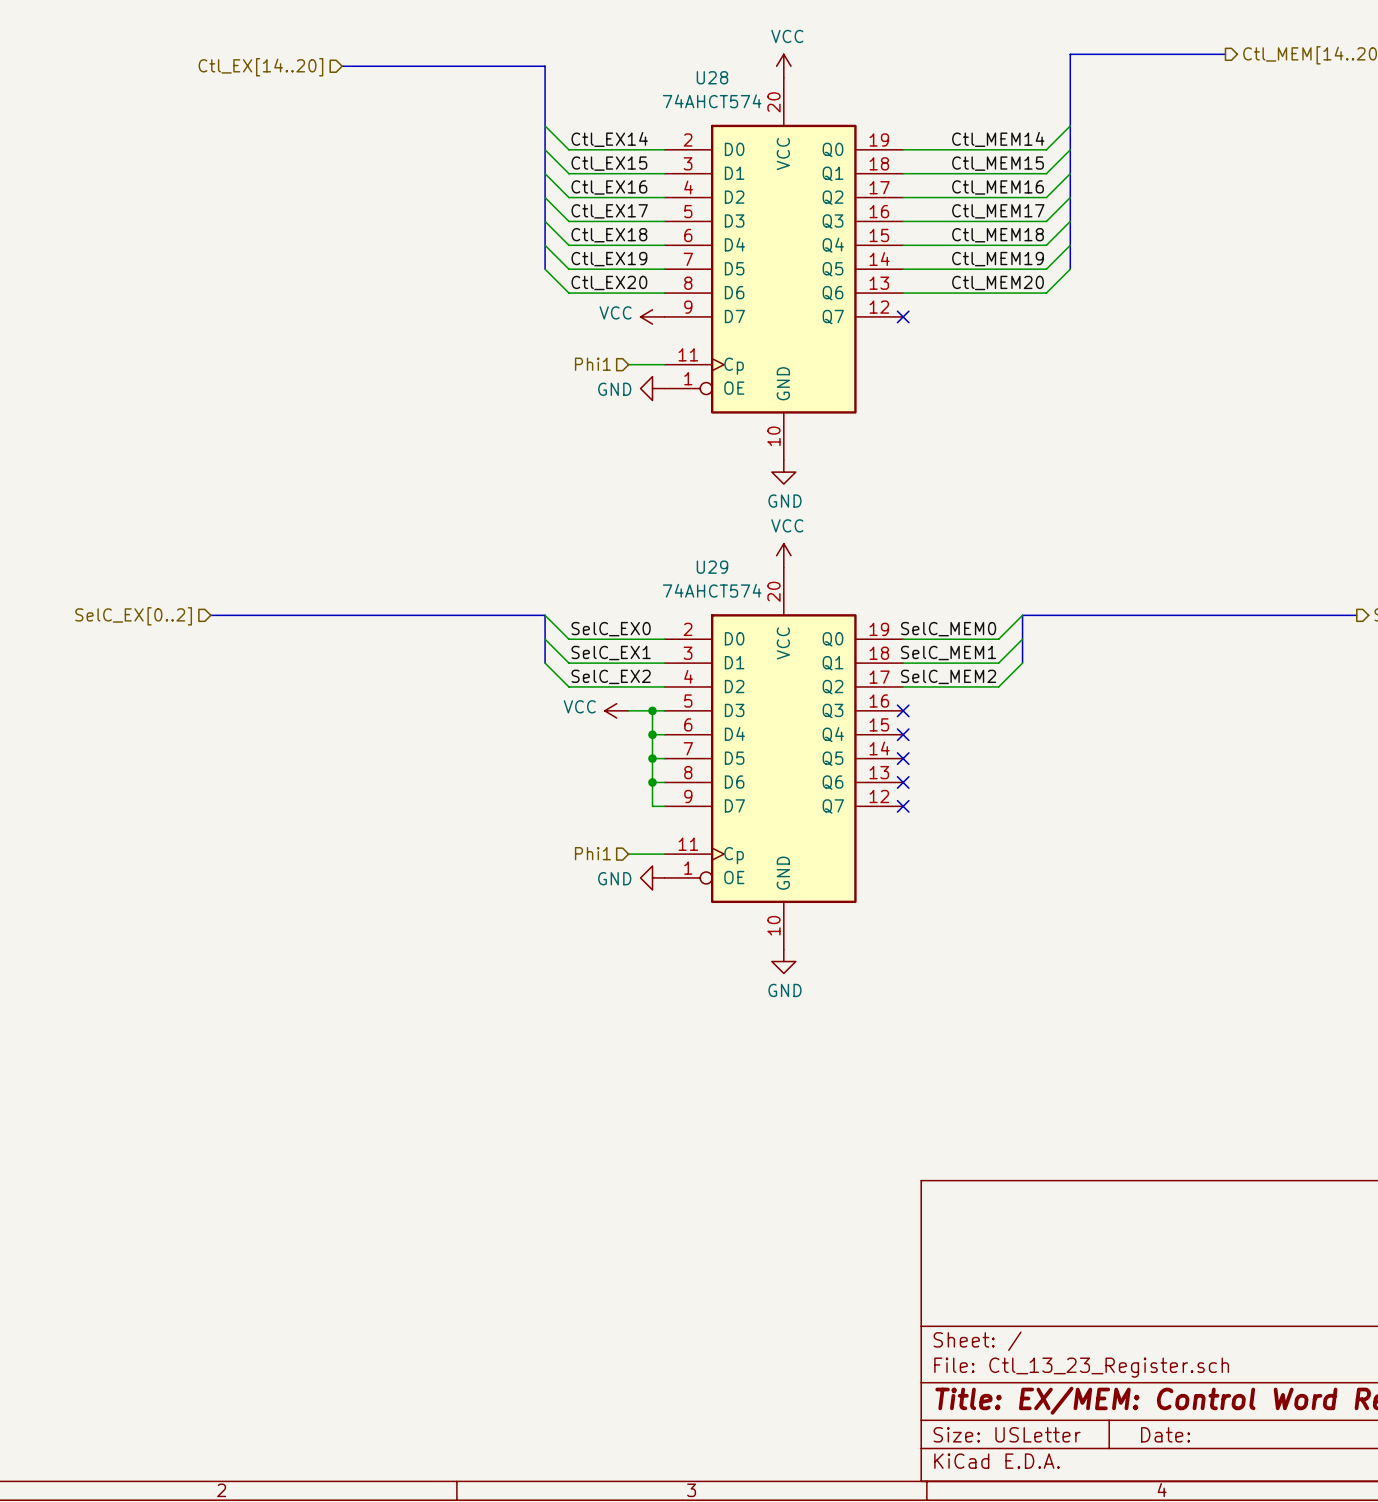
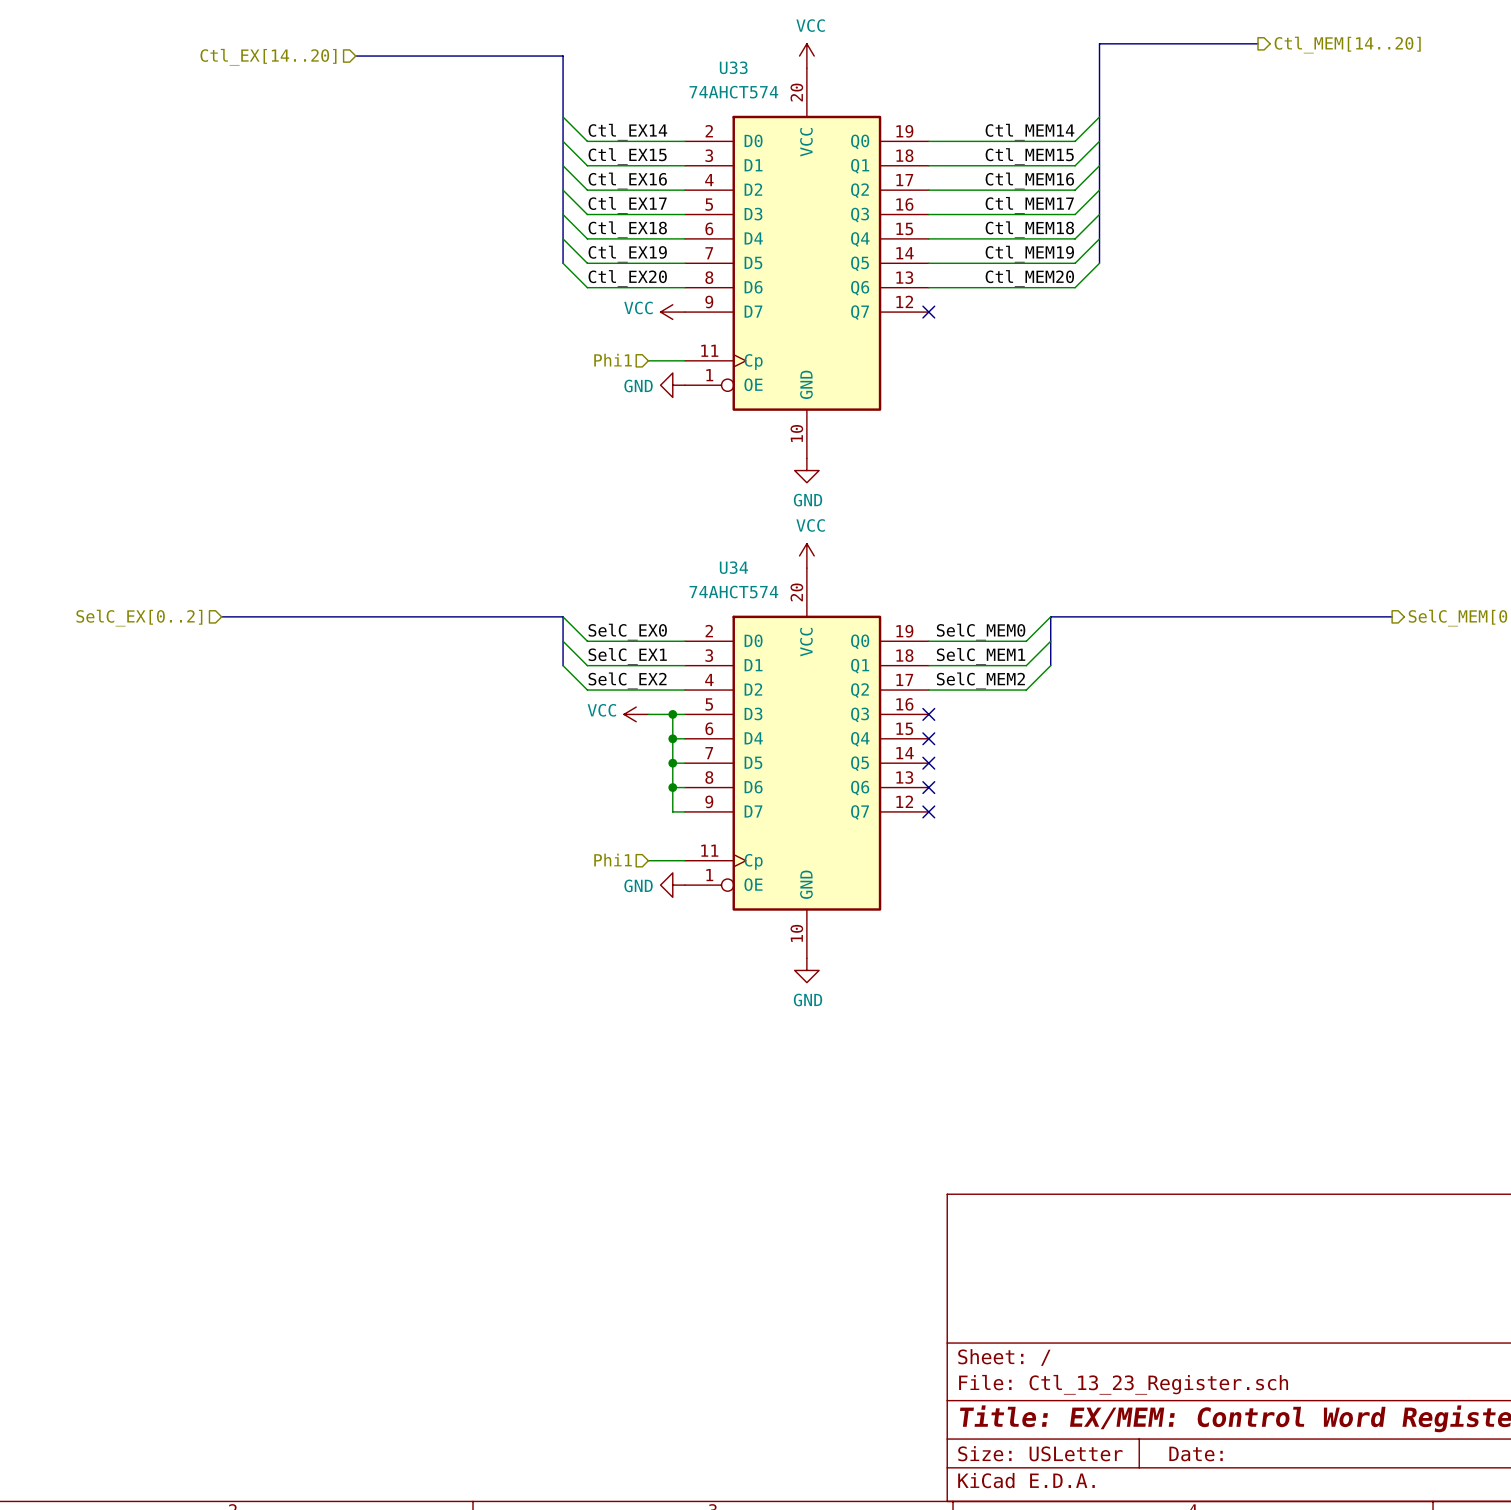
U28 name: U28 (712, 77) -> U33 (733, 67)
U29 name: U29 (712, 567) -> U34 (733, 567)

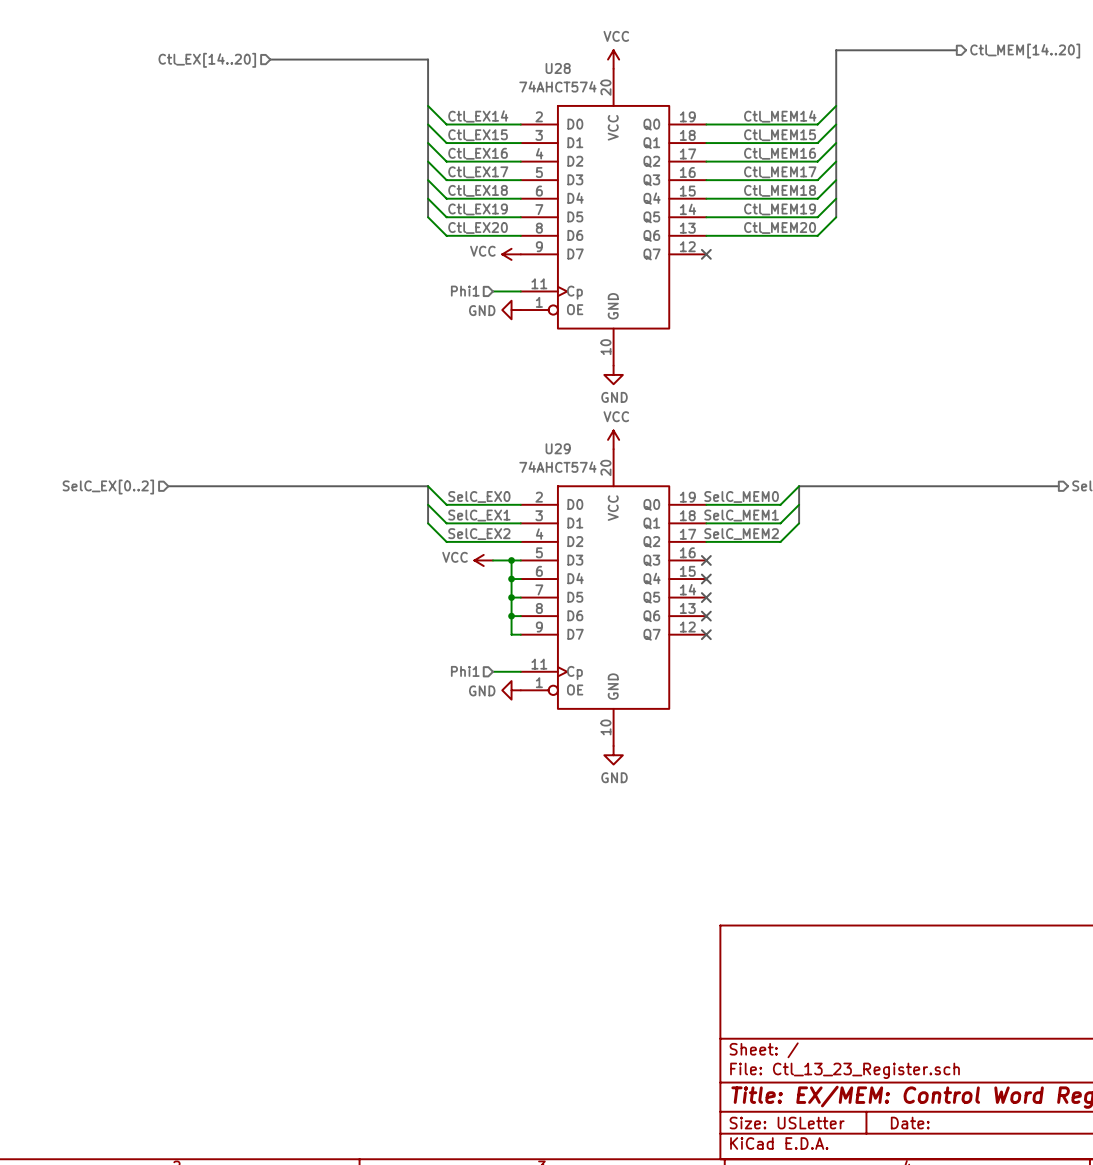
U33 name: U33 (733, 67) -> U28 (558, 68)
U34 name: U34 (733, 567) -> U29 (558, 448)

